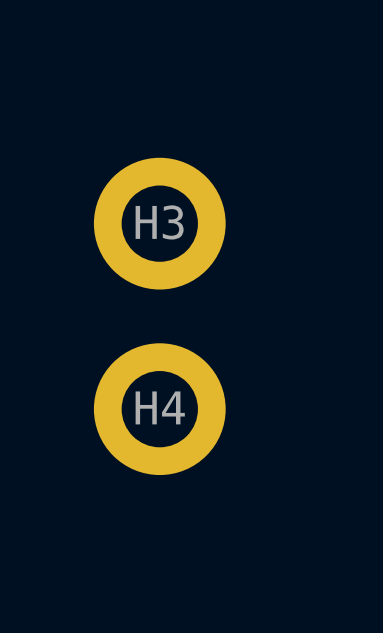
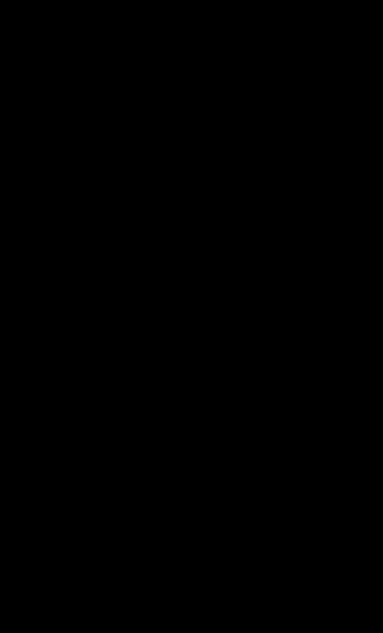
H3: (159, 223) -> none
H4: (159, 409) -> none

